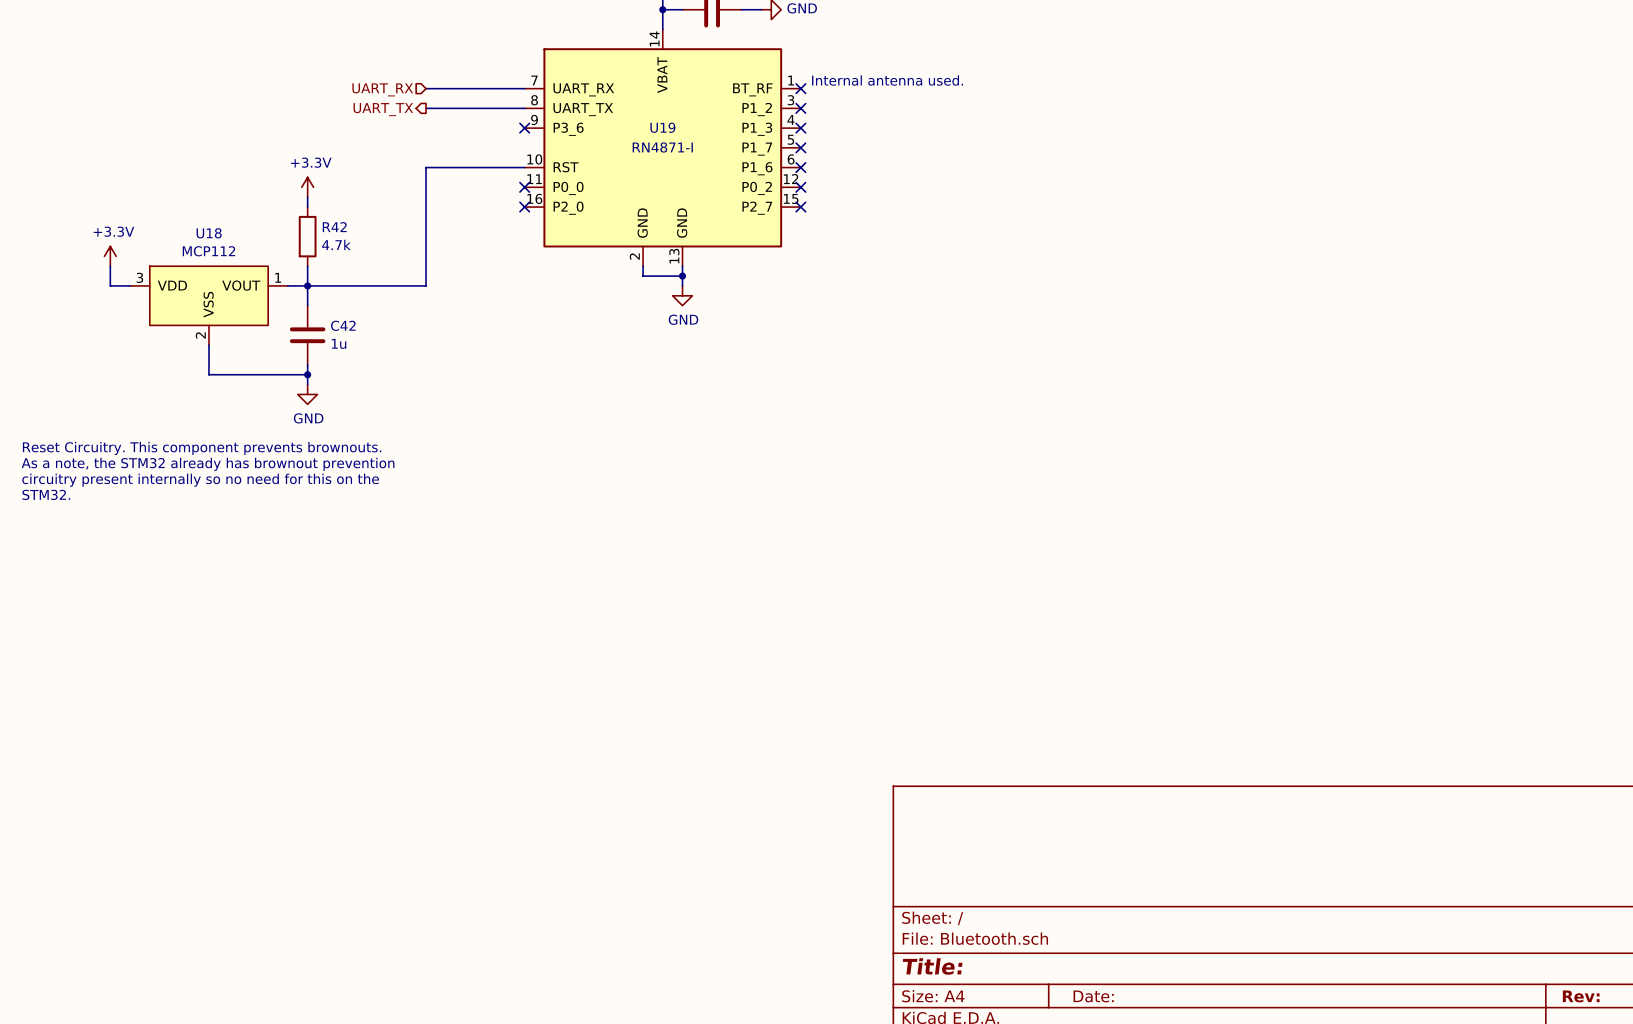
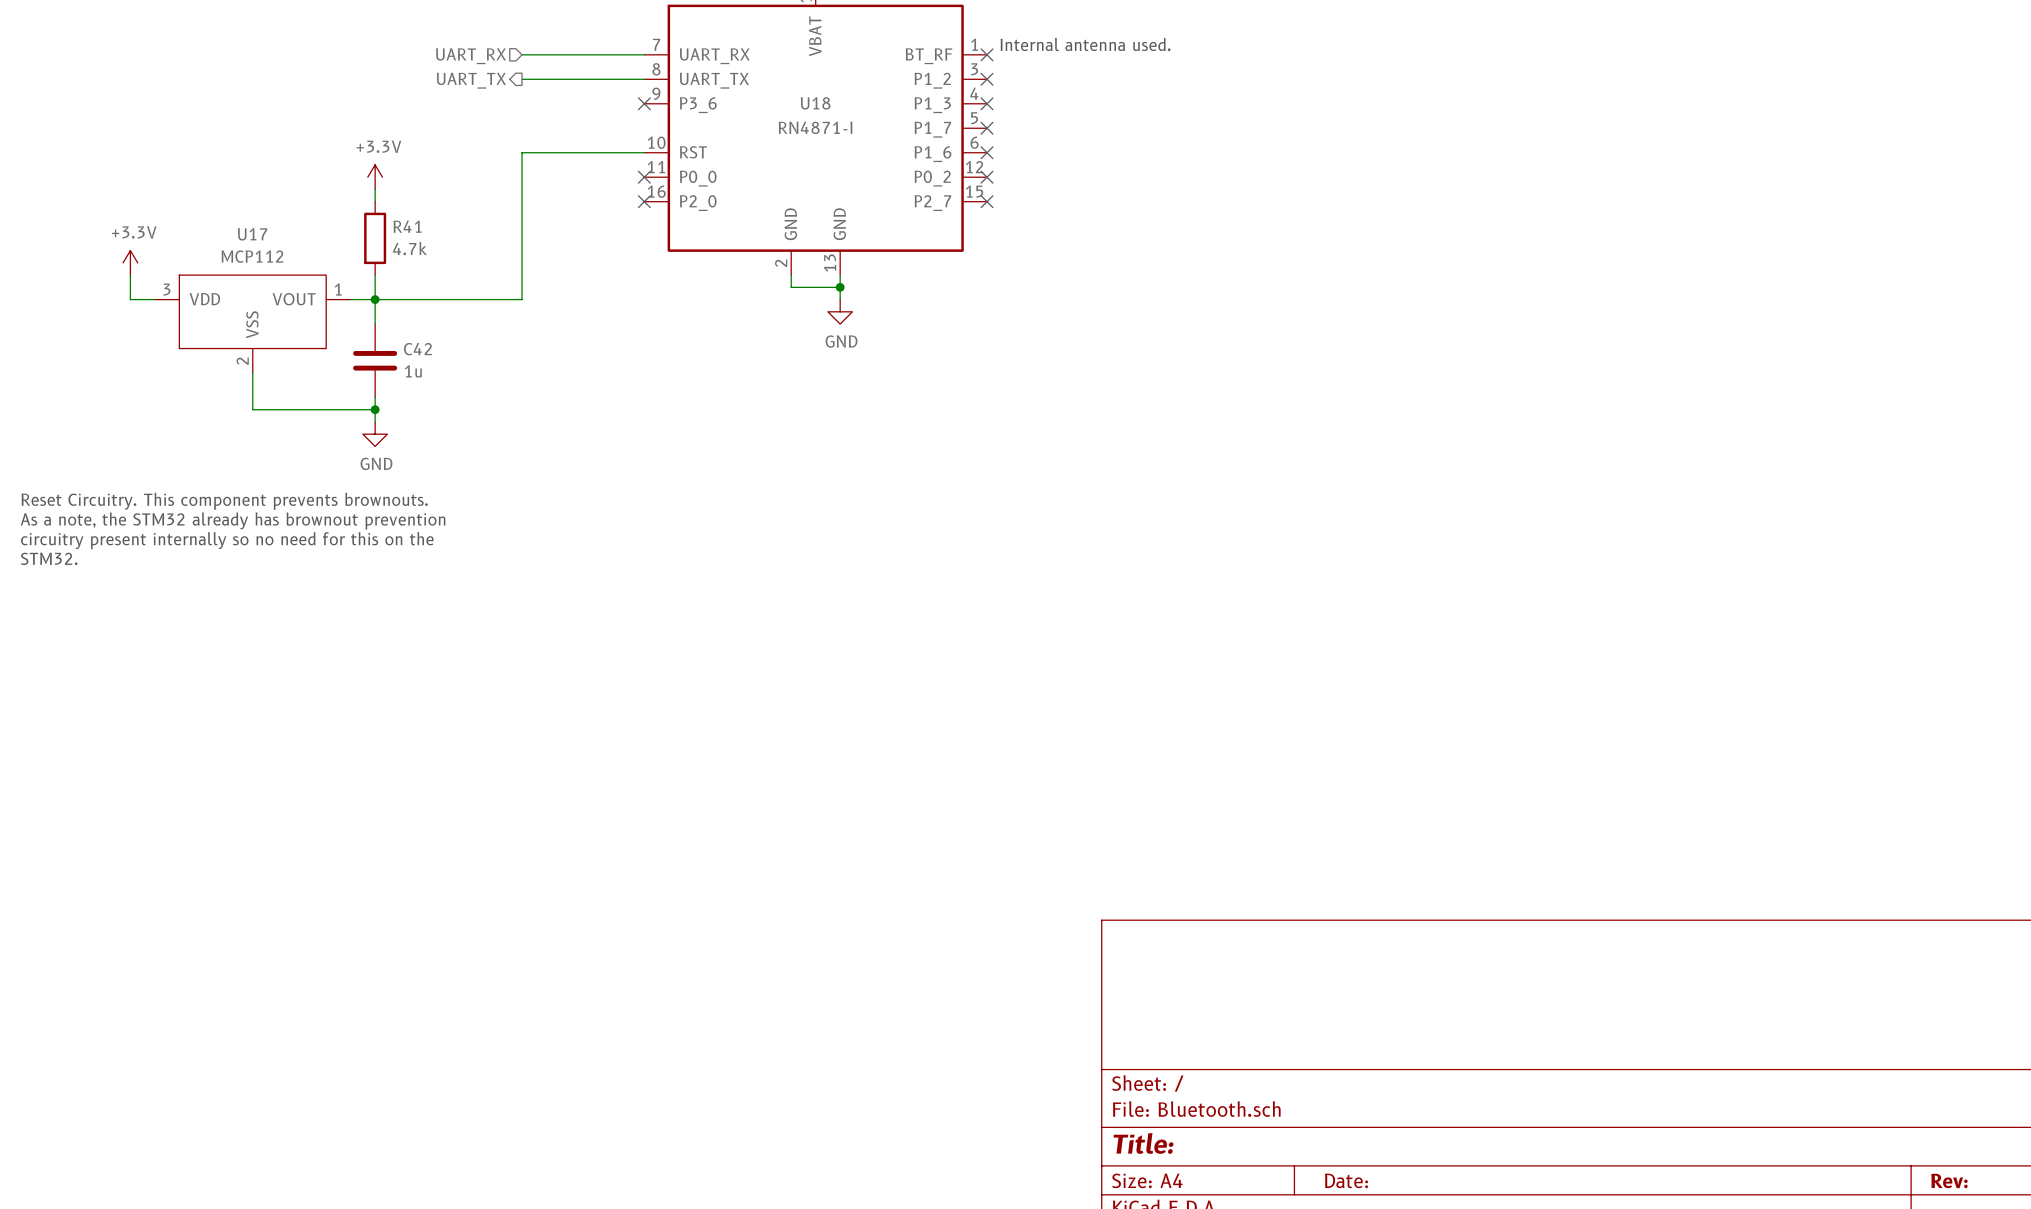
U19 name: U19 (662, 127) -> U18 (815, 103)
R42 name: R42 (334, 227) -> R41 (407, 226)
U18 name: U18 (209, 233) -> U17 (252, 234)

